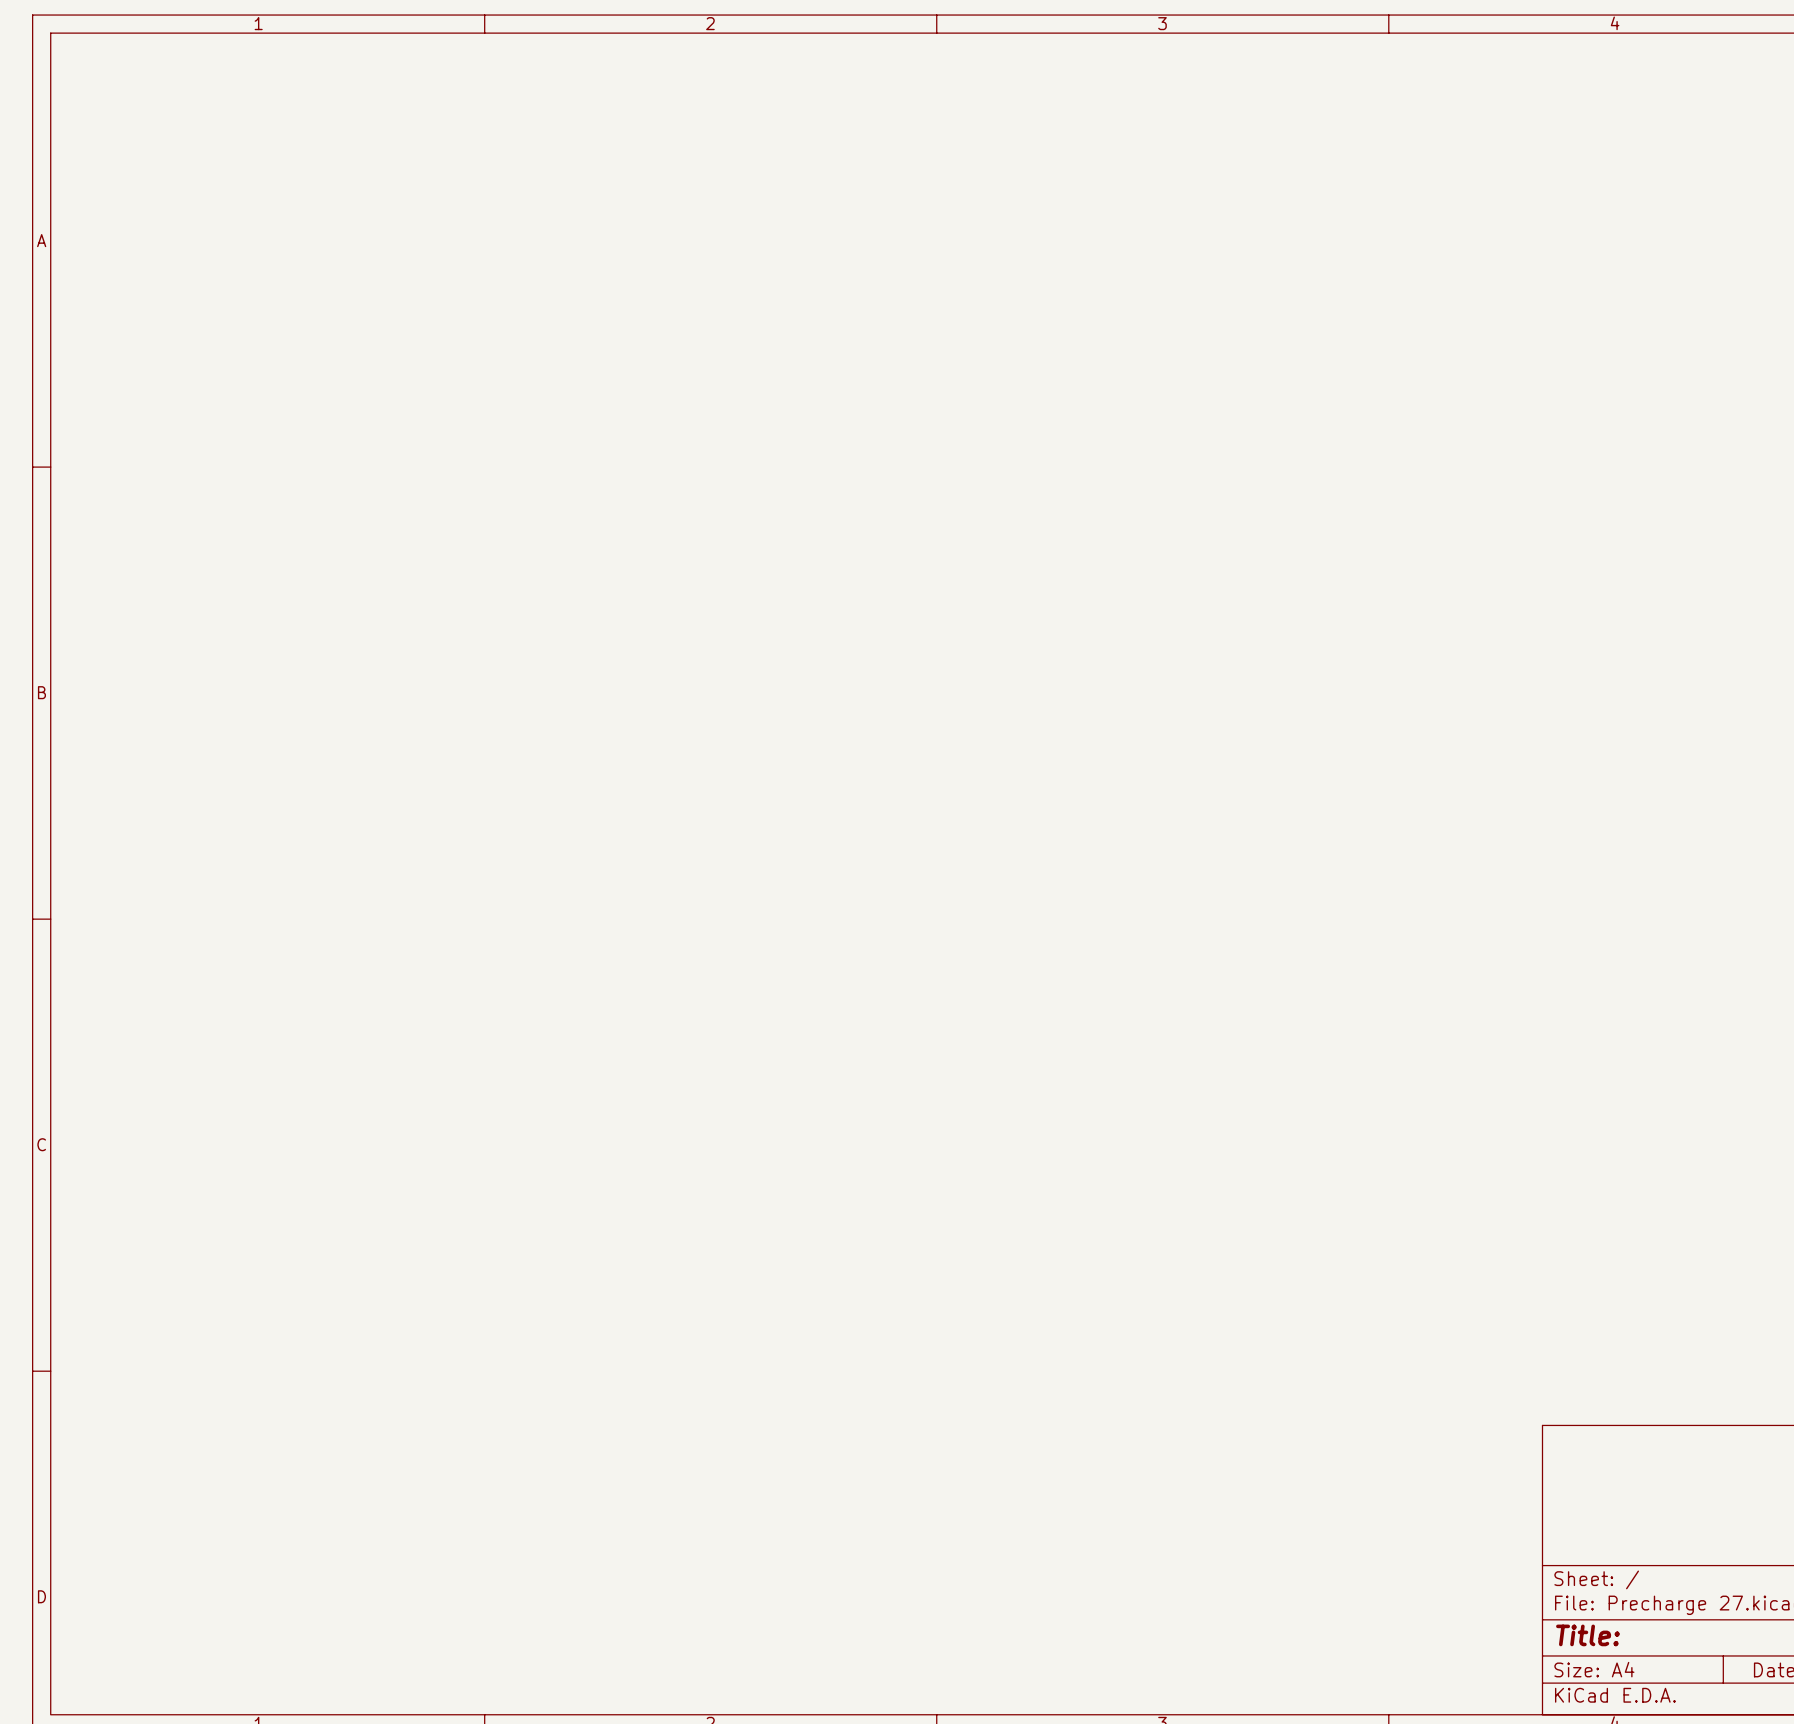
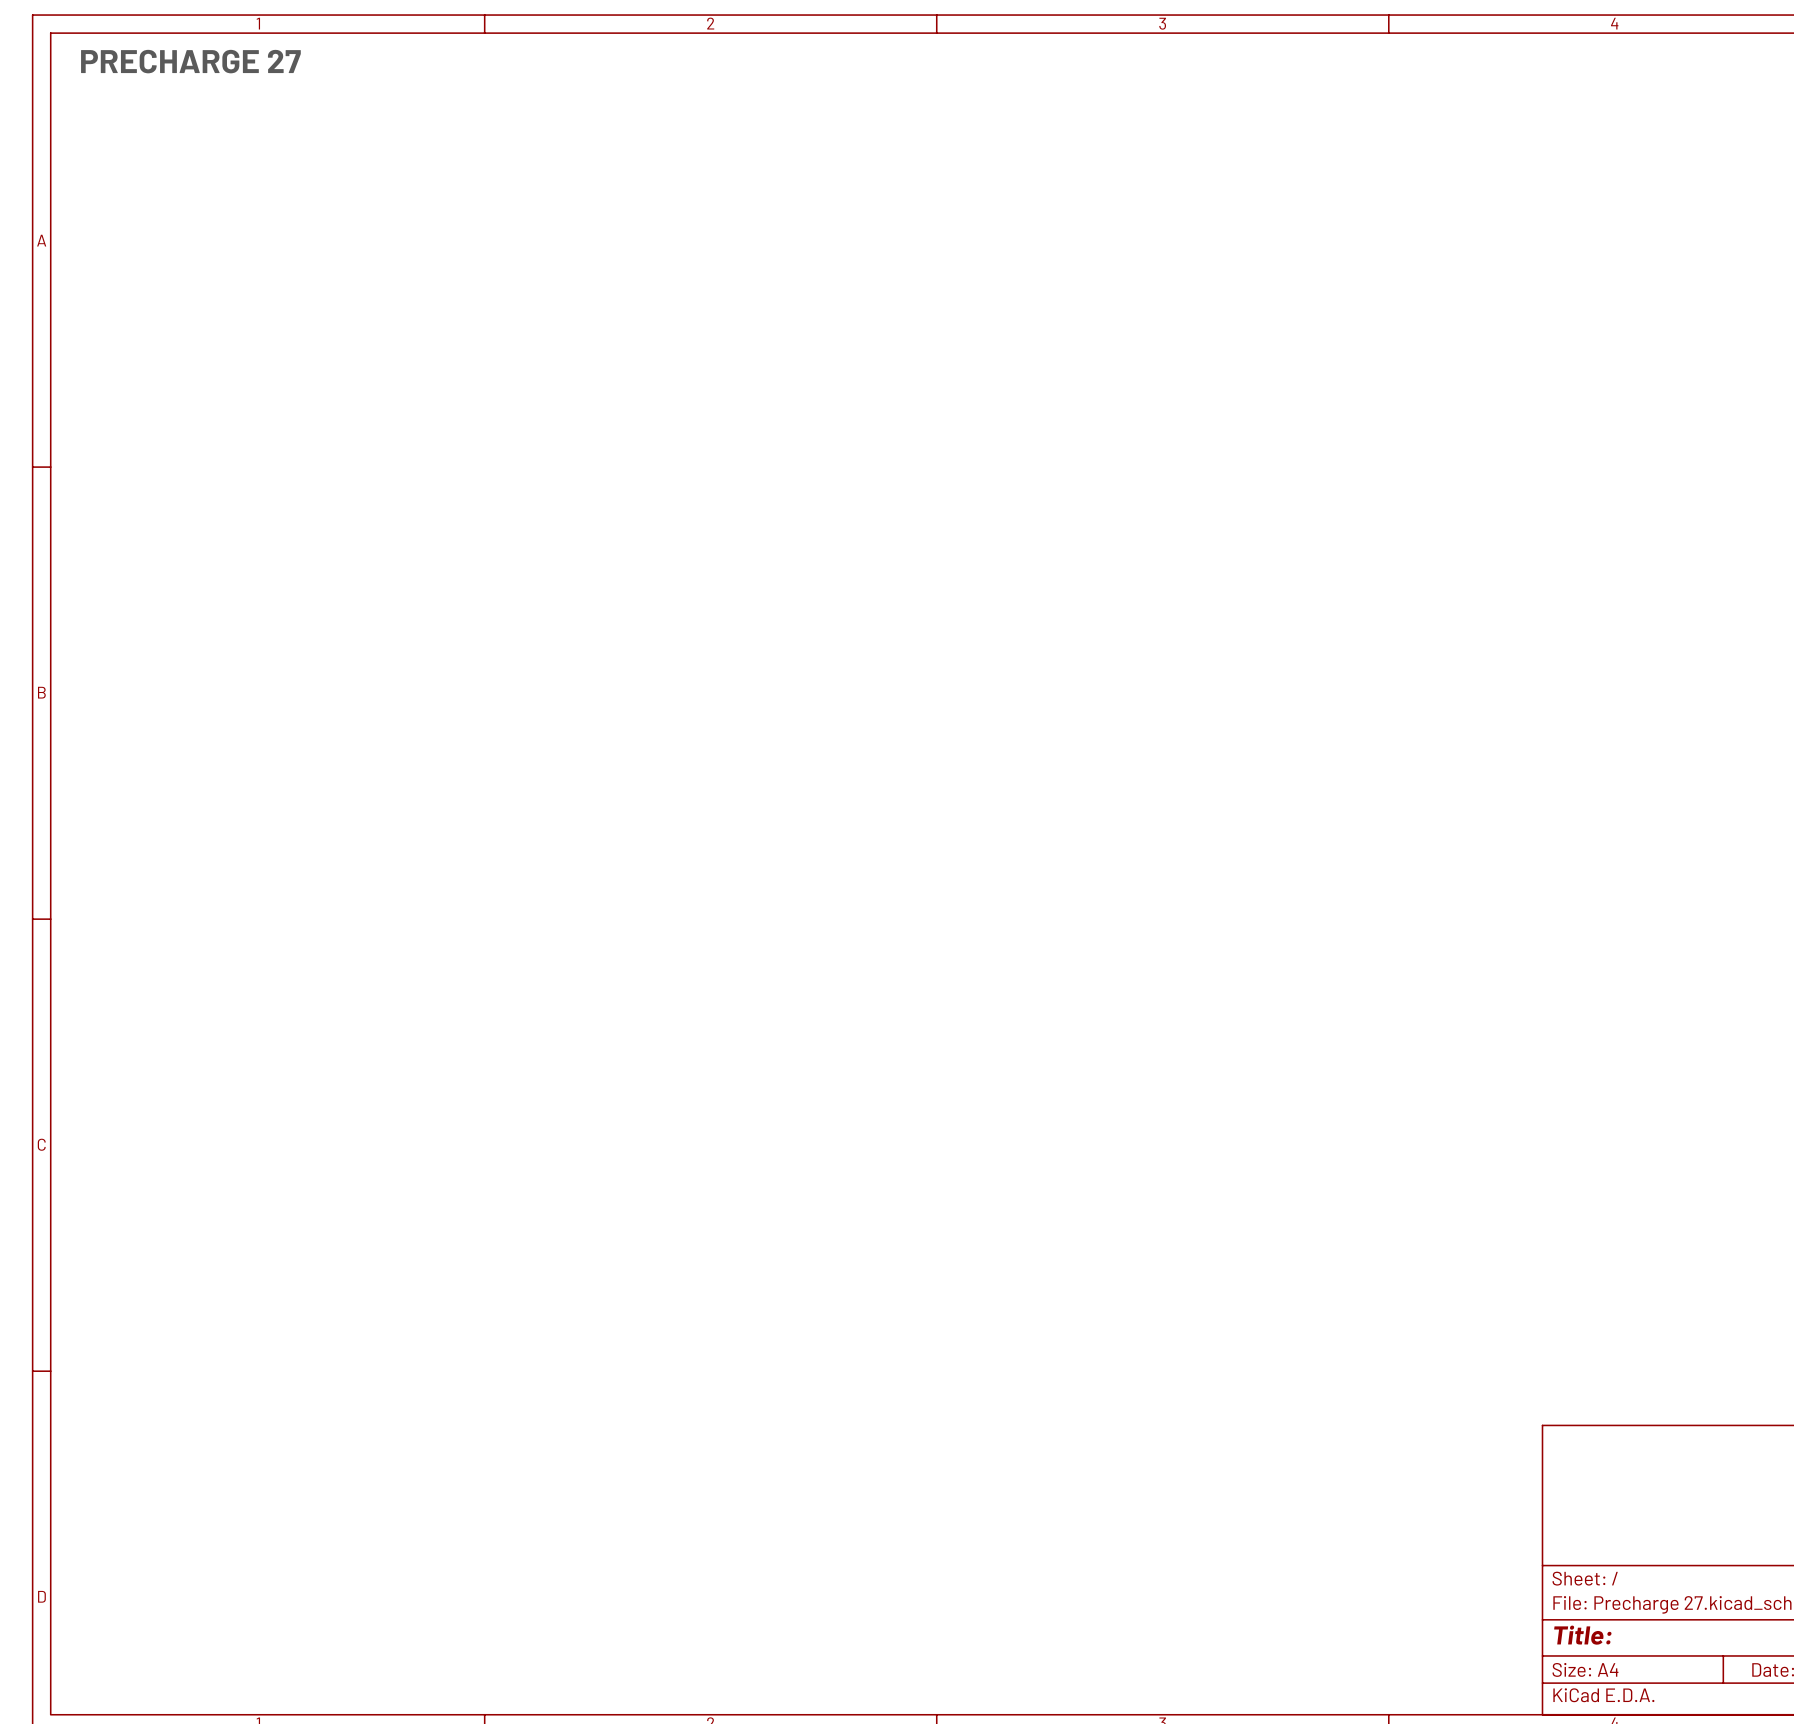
text: none -> PRECHARGE 27 (190, 61)

